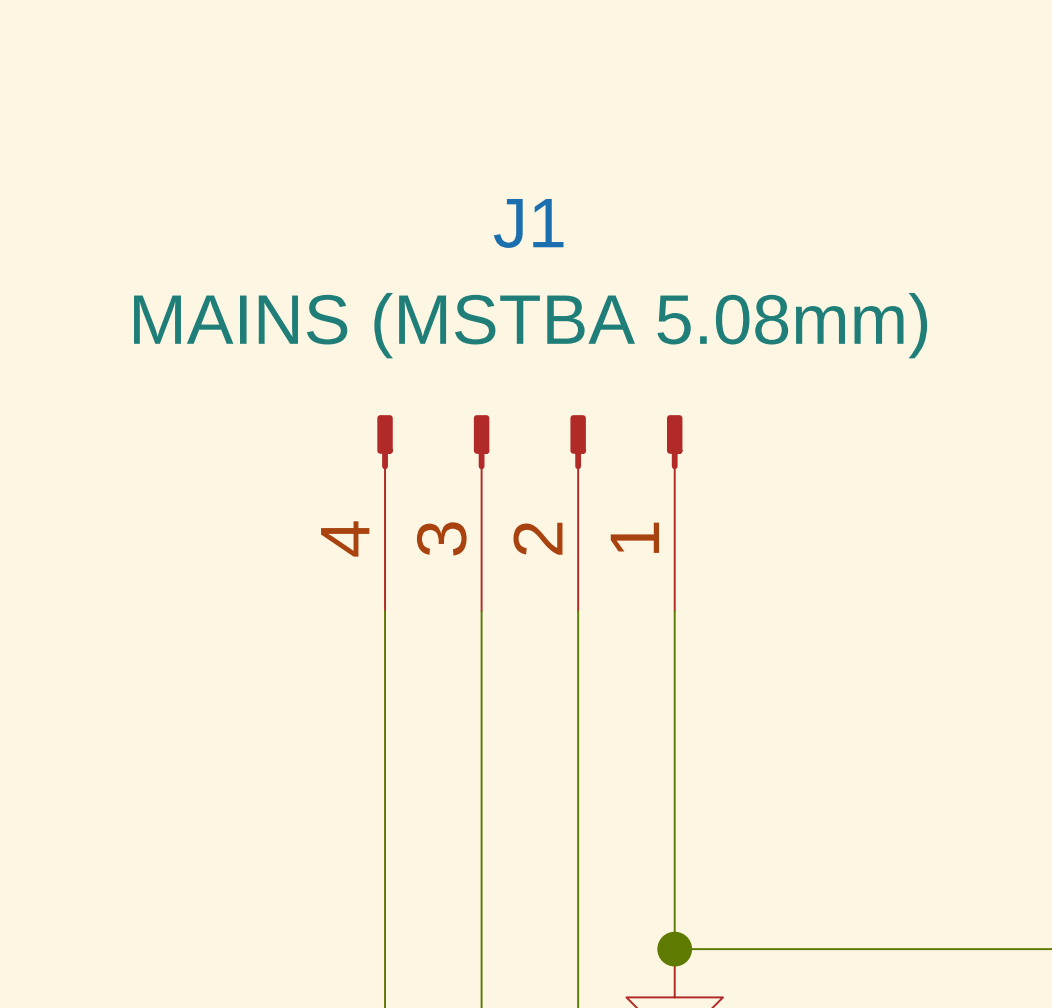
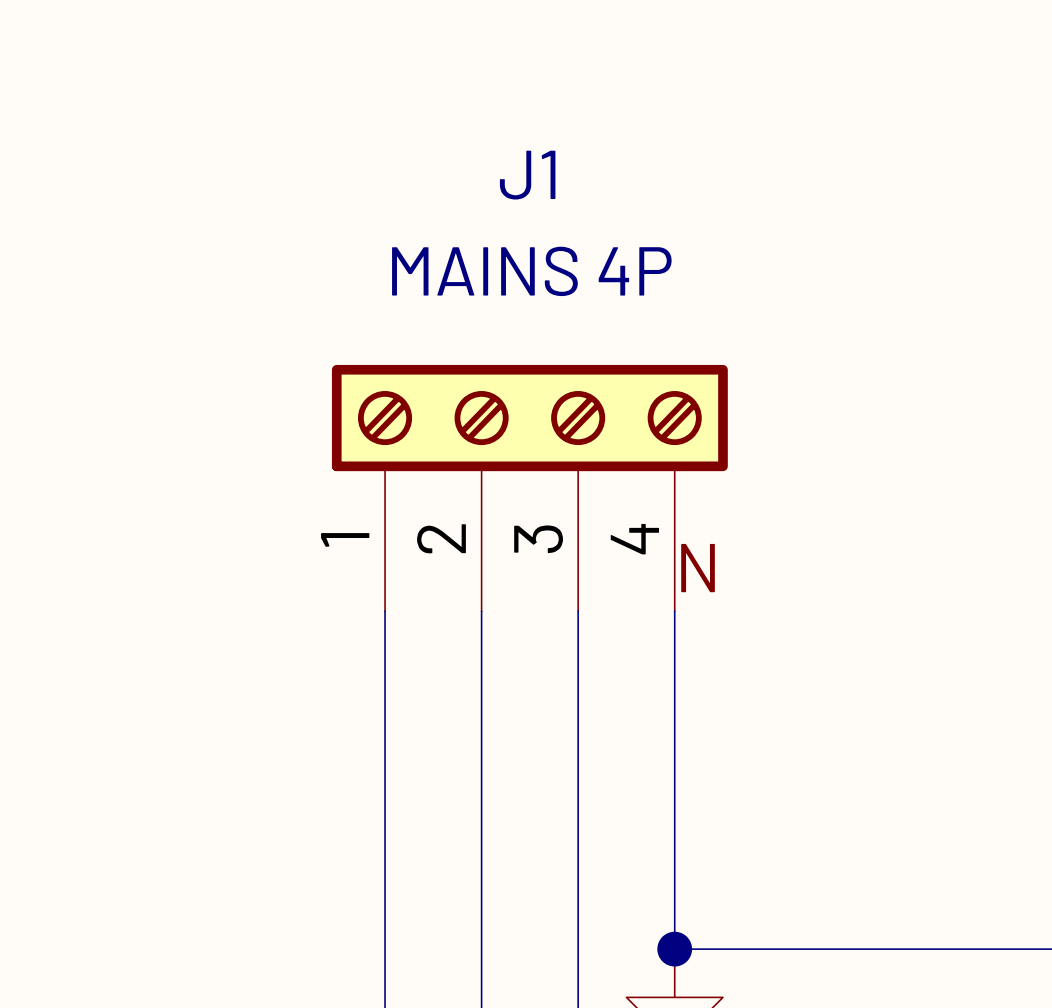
J1 value: MAINS (MSTBA 5.08mm) (530, 325) -> MAINS 4P (531, 271)
J1 symbol: [377, 415, 683, 612] -> [331, 364, 728, 612]
label: none -> N (698, 568)

